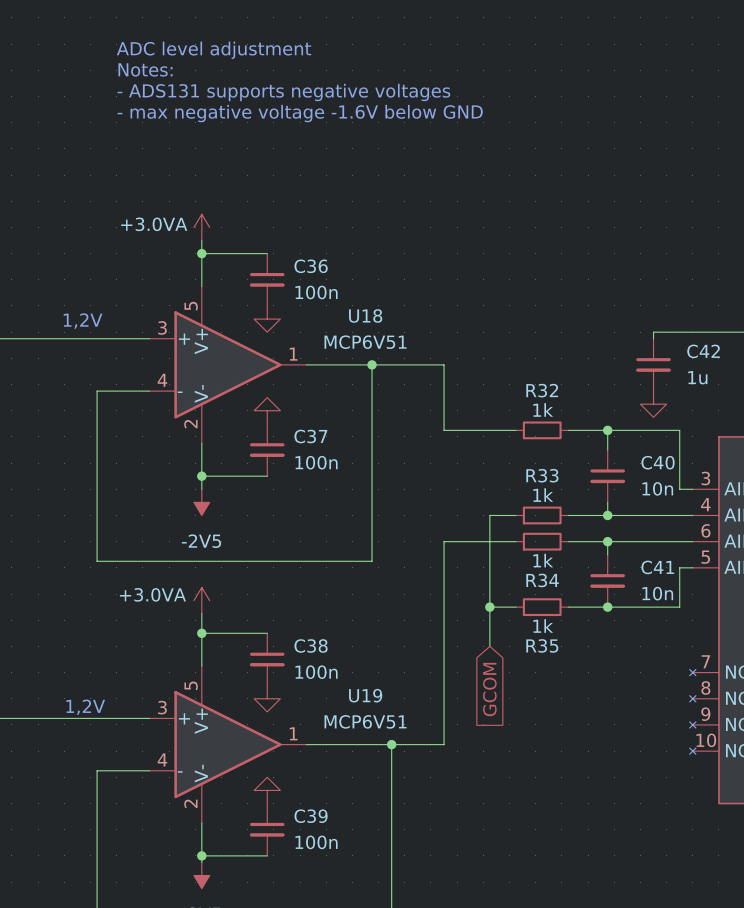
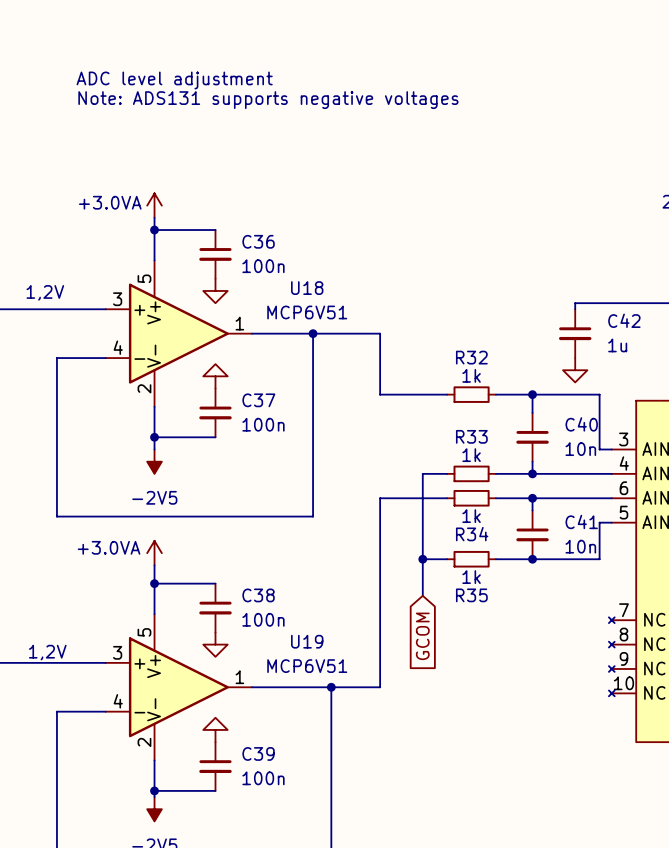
text: ADC level adjustment (214, 50) -> none
text: Notes: (145, 69) -> none
text: - ADS131 supports negative voltages (283, 92) -> ADC level adjustment (174, 80)
text: - max negative voltage -1.6V below GND (300, 113) -> Note: ADS131 supports negative voltages (268, 100)

